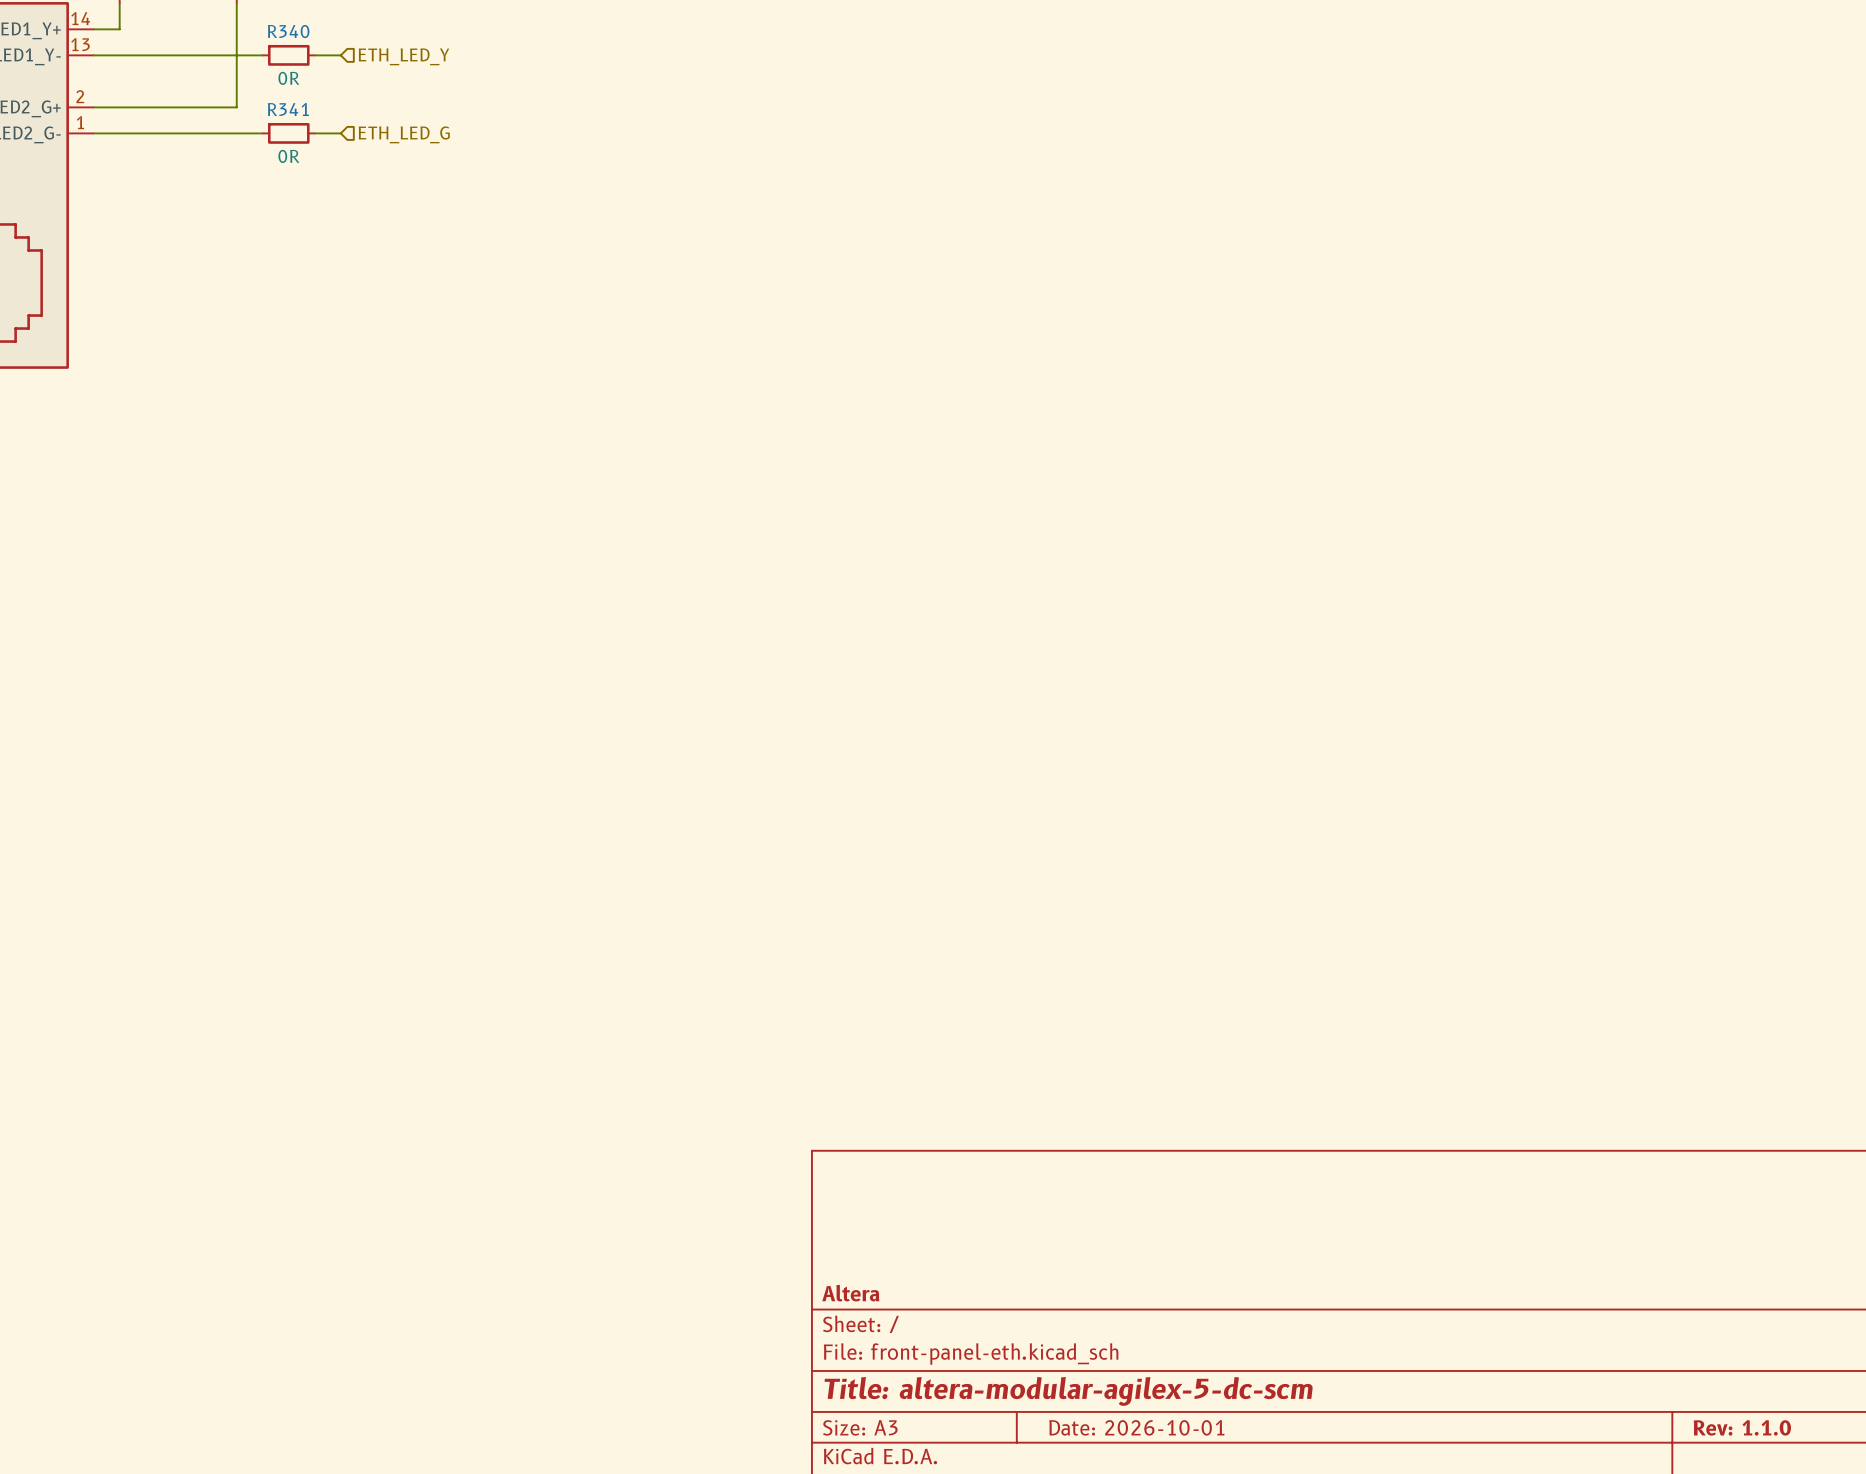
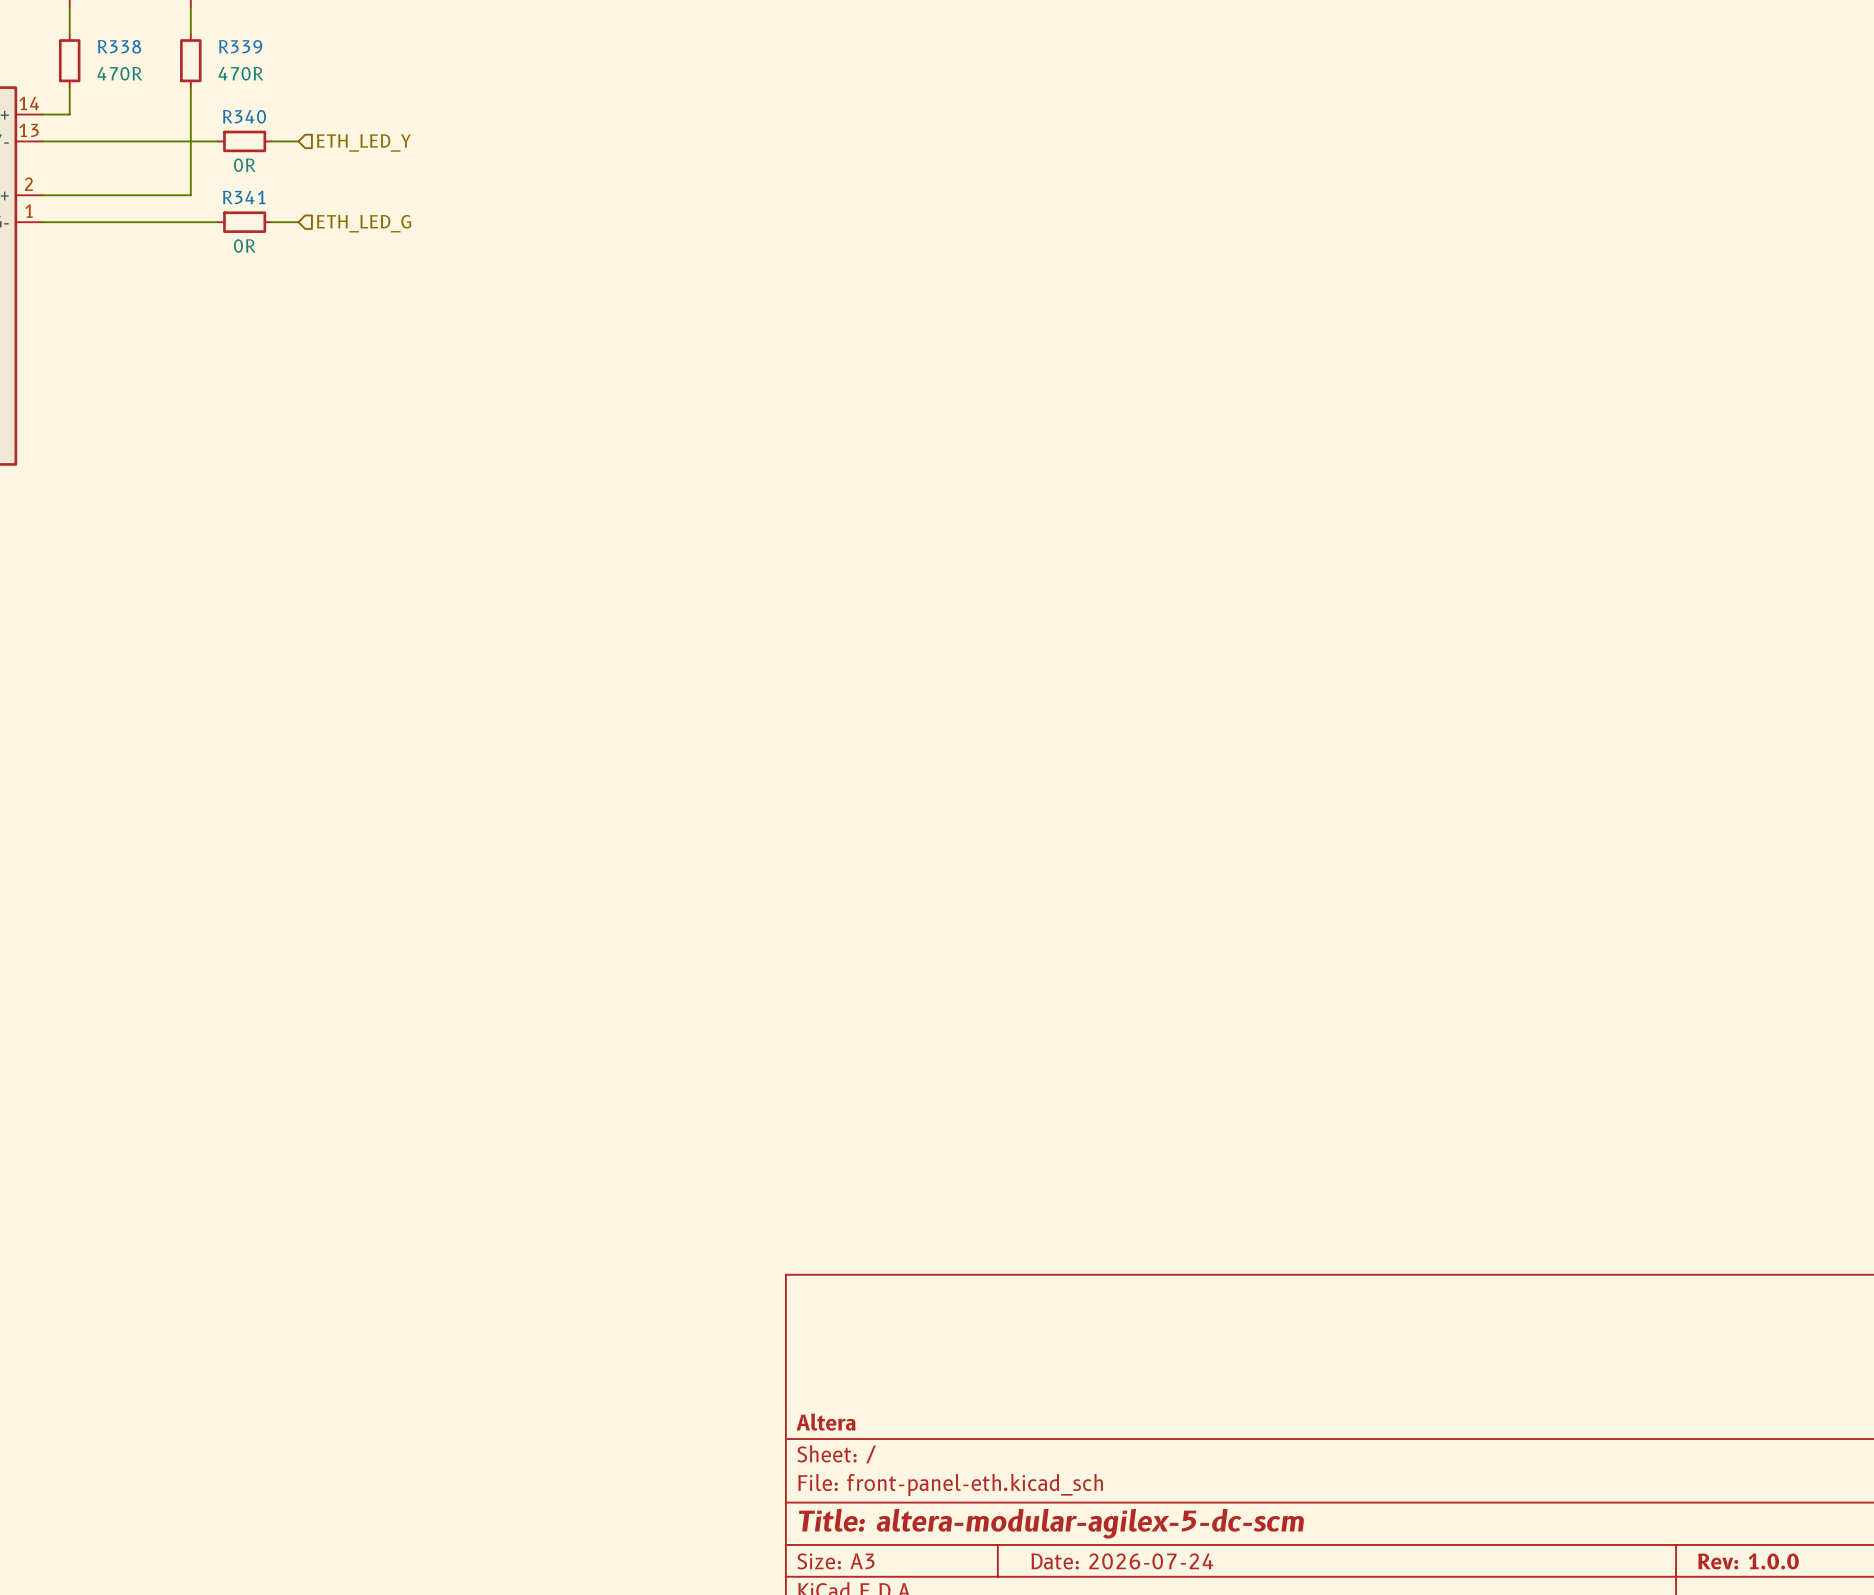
title block: Date: 2026-10-01 (1136, 1427) -> Date: 2026-07-24 (1122, 1561)
title block: Rev: 1.1.0 (1742, 1427) -> Rev: 1.0.0 (1748, 1561)

